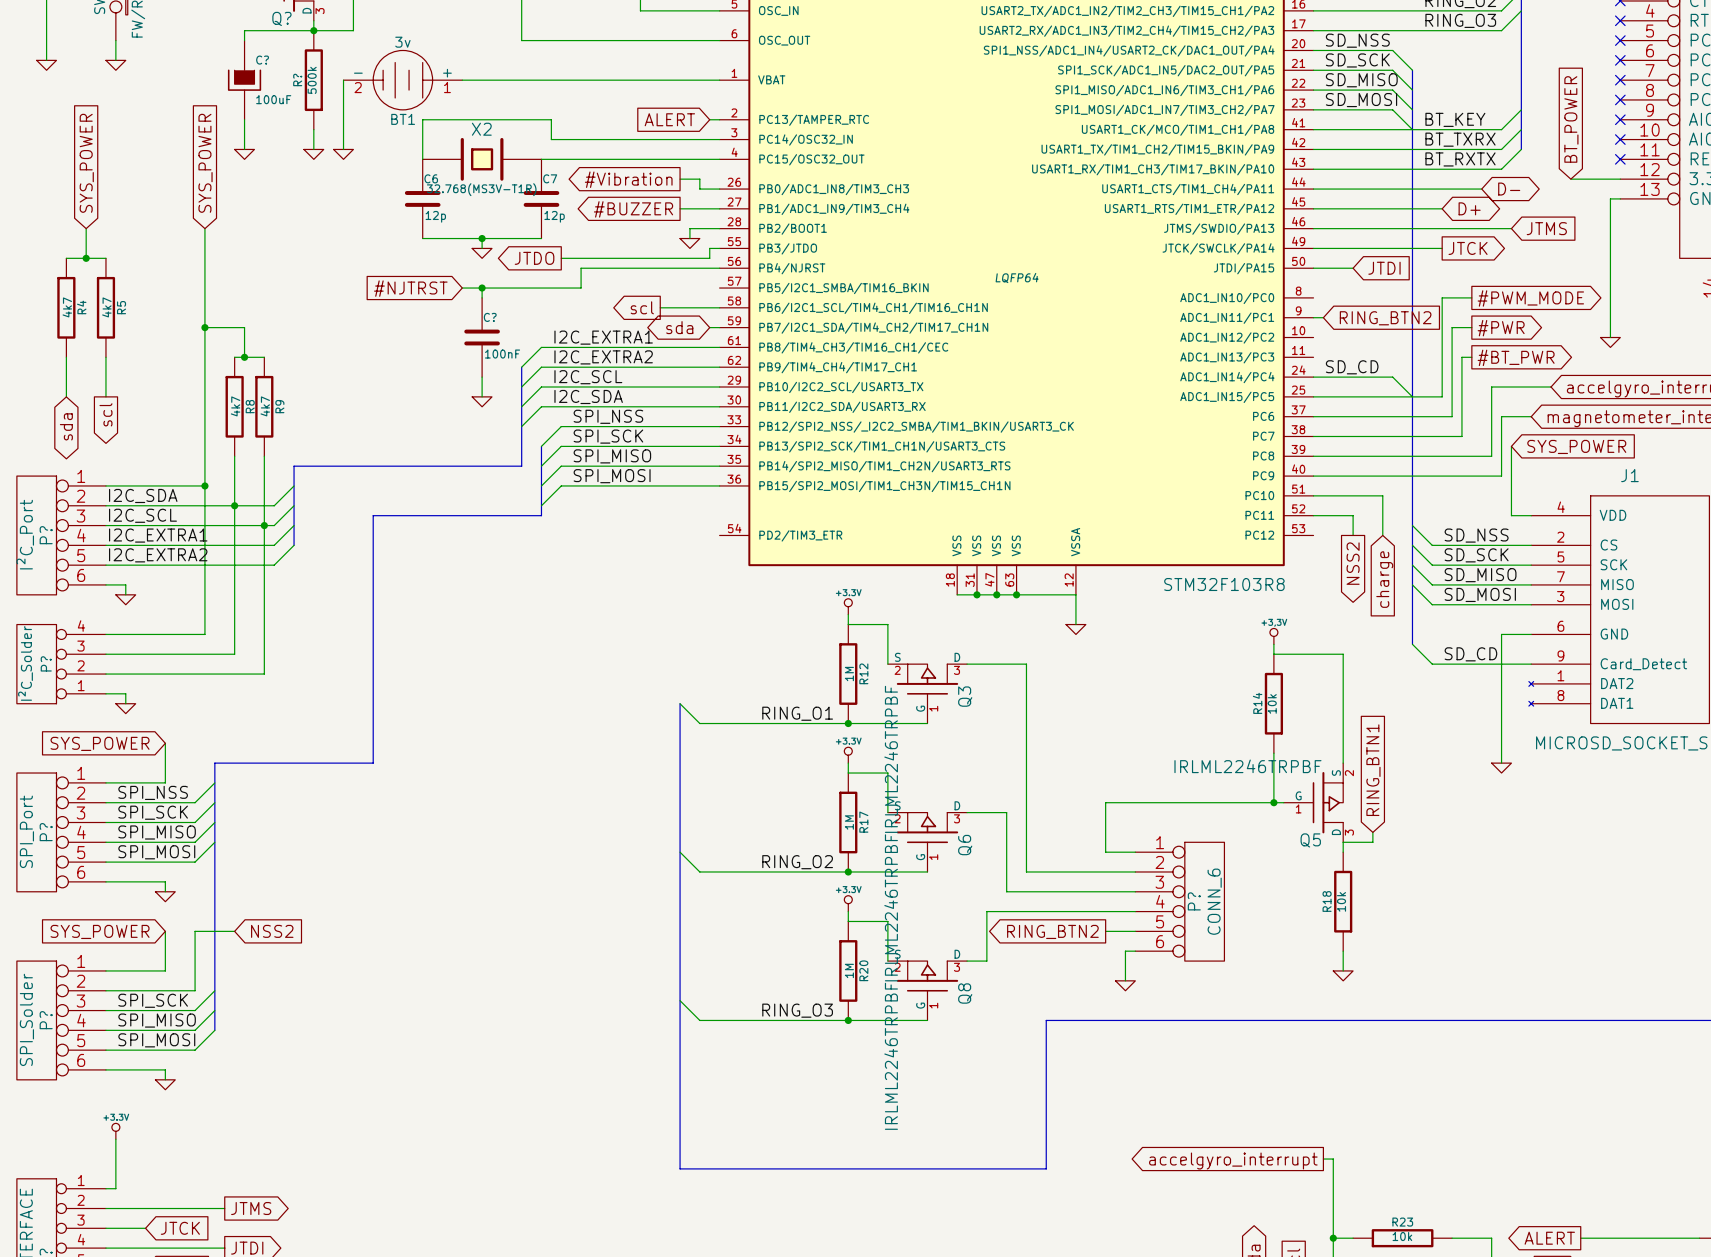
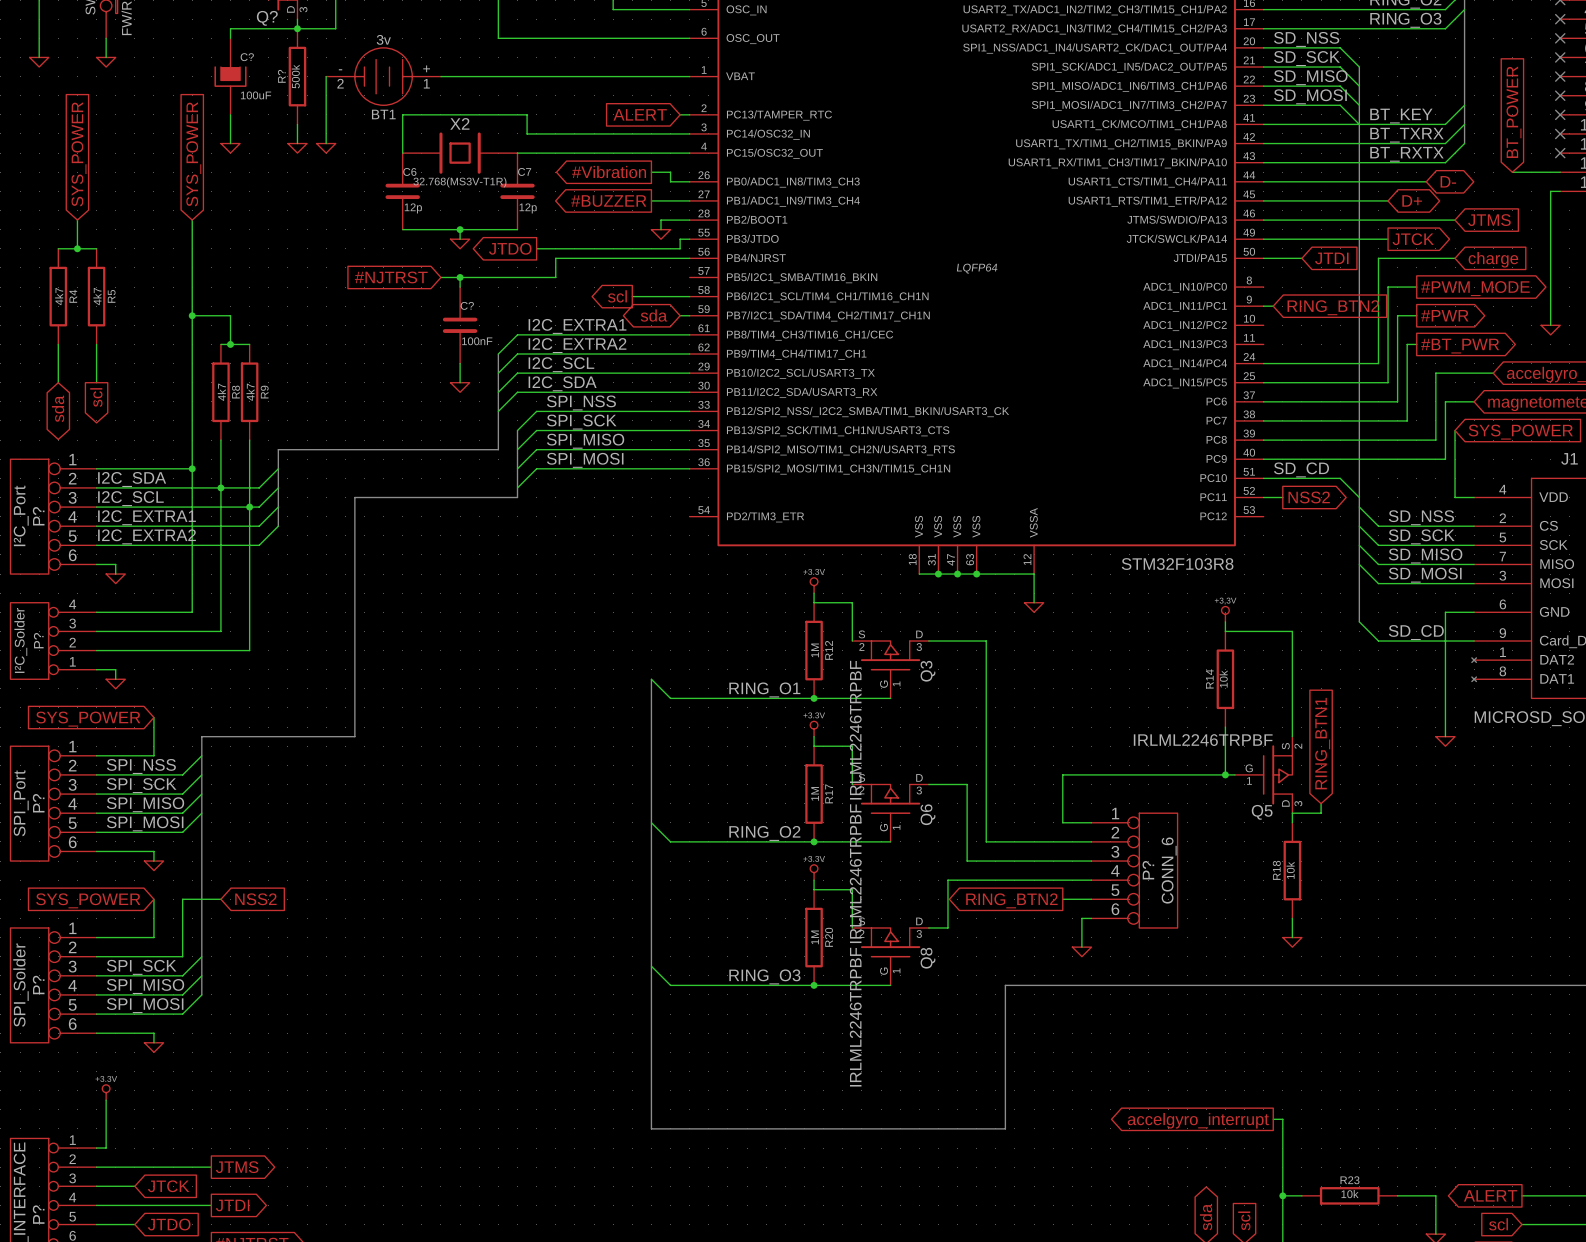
global label: none -> charge (1493, 259)
label position: SD_CD (1352, 367) -> SD_CD (1301, 469)
wire: (1392, 377) (1412, 396) -> (1340, 363) (1378, 363) (1378, 258) (1455, 258)
wire: (1382, 495) (1382, 535) -> (1330, 478) (1340, 478) (1359, 497)
wire: (1333, 515) (1353, 515) (1353, 535) -> none
global label rotation: 0° (1353, 563) -> 90° counterclockwise (1309, 497)
global label: charge (1384, 579) -> none

